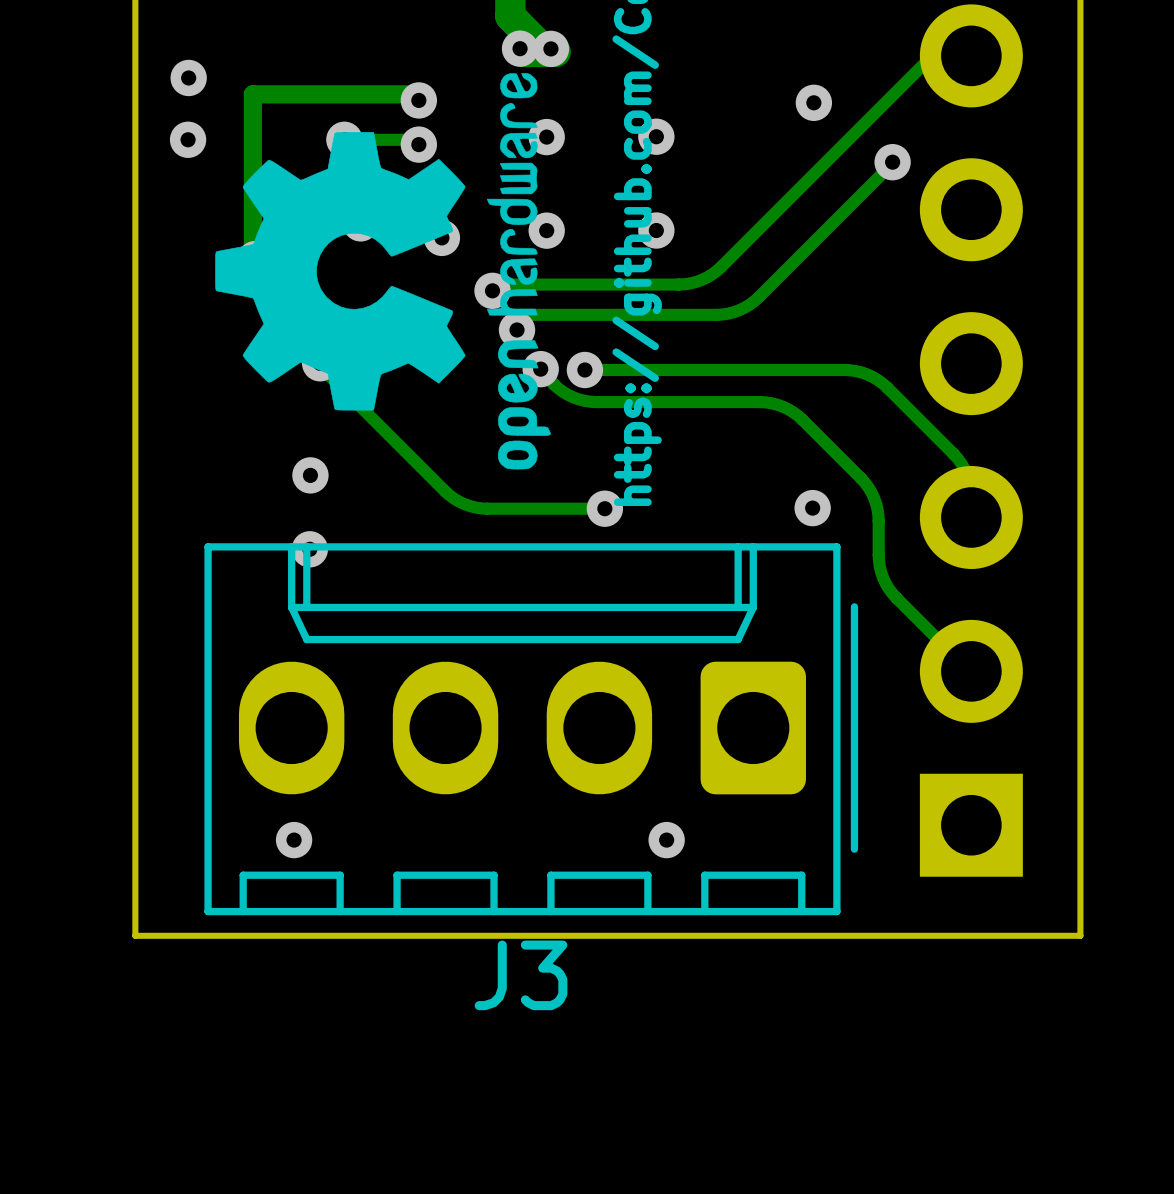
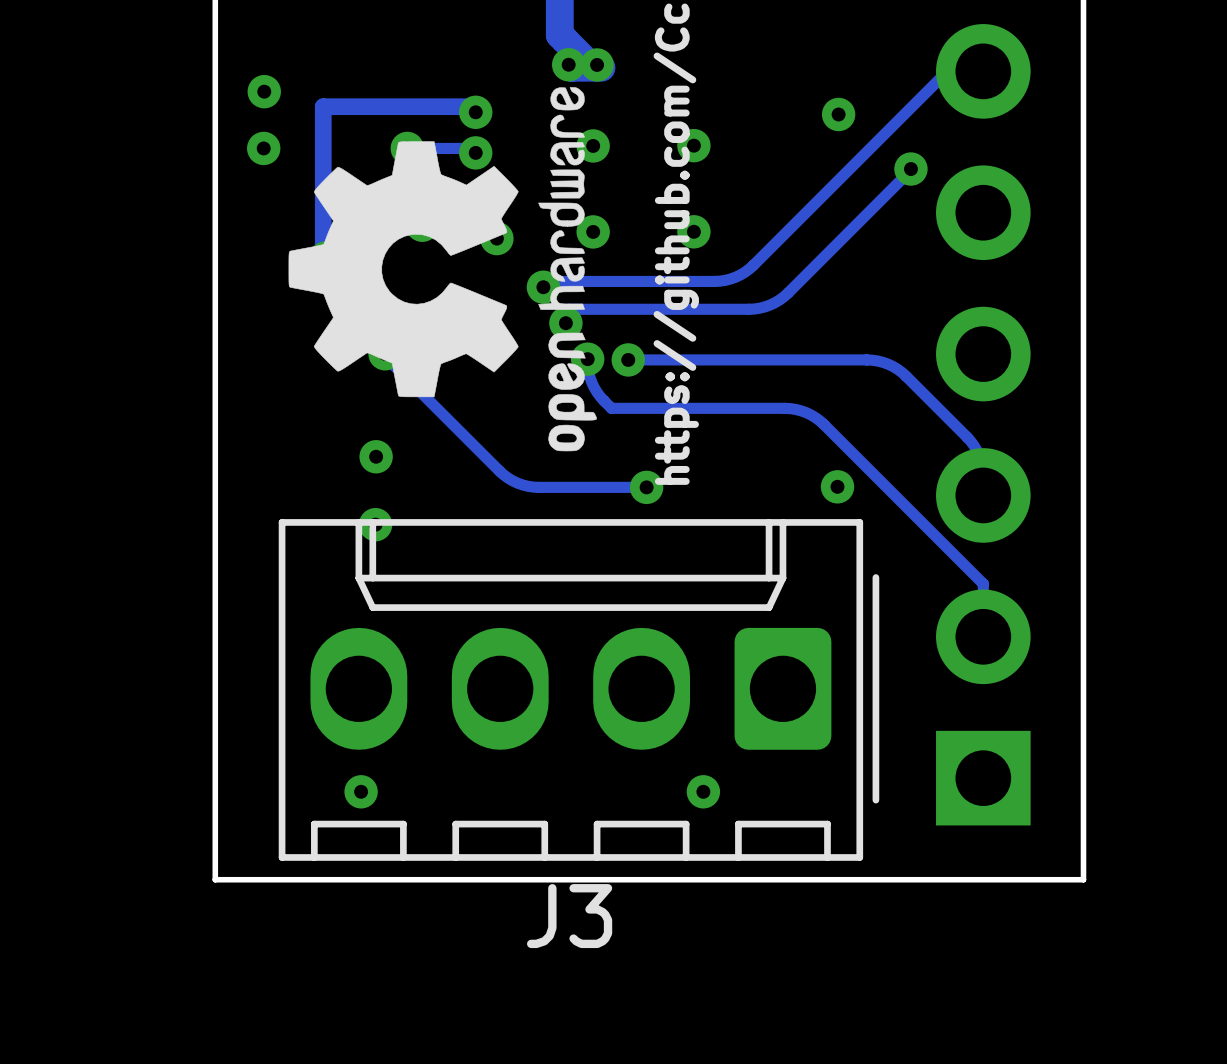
track: (540, 371) (563, 391) (584, 400) (765, 402) (782, 406) (793, 412) (860, 478) (871, 492) (878, 515) (879, 566) (888, 588) (971, 671) -> (587, 361) (590, 377) (594, 387) (611, 408) (784, 408) (800, 410) (815, 417) (983, 583) (983, 636)

